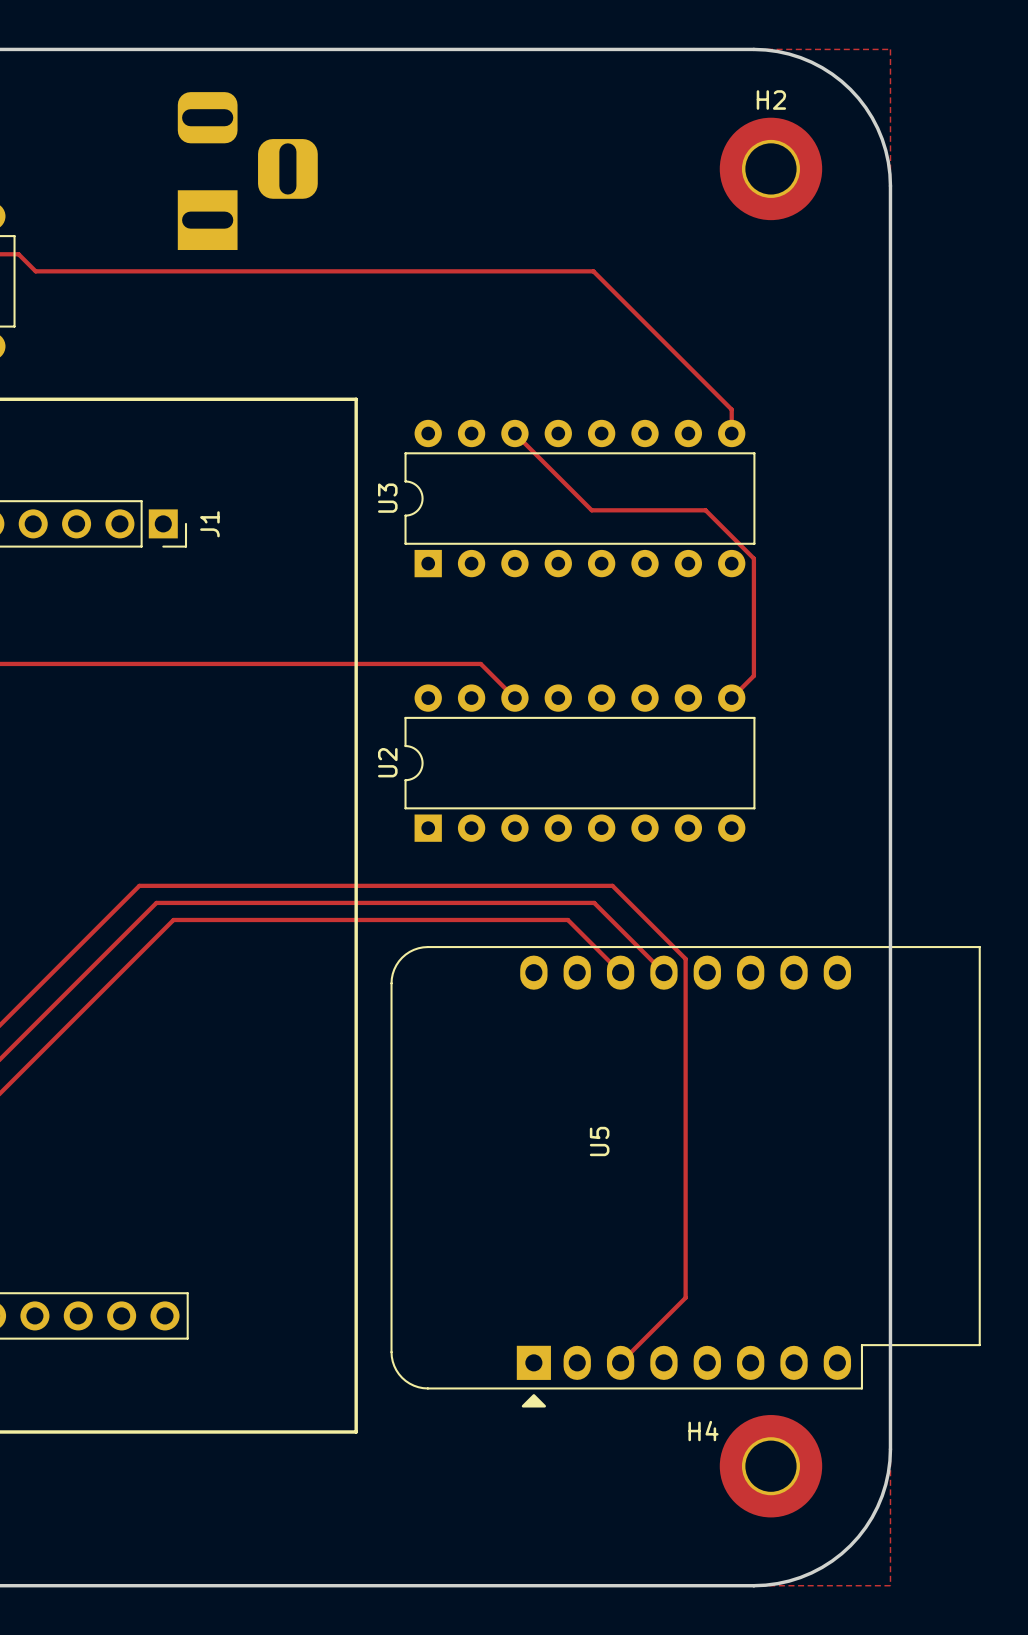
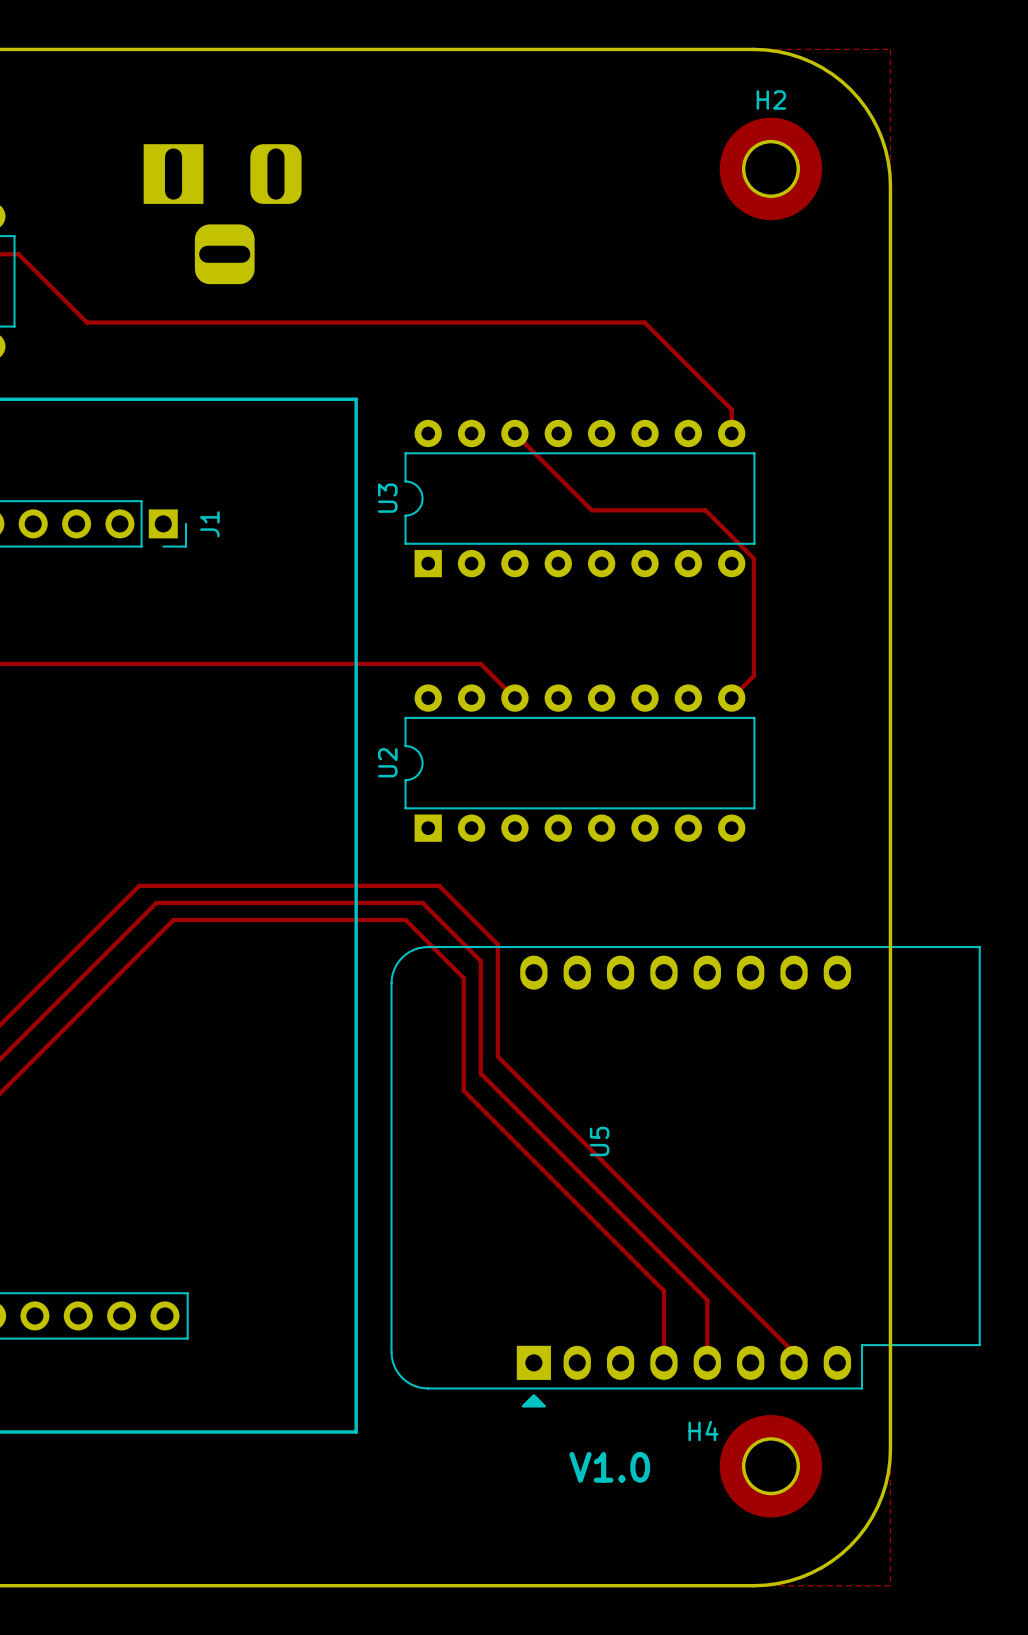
part rotation: 0° (247, 171) -> 90° clockwise (222, 214)
track: (35, 271) (593, 271) (644, 322) -> (35, 271) (86, 322) (644, 322)
track: (439, 885) (612, 885) (685, 958) (685, 1297) (620, 1362) -> (439, 885) (497, 944) (497, 1056) (794, 1352) (794, 1362)
track: (422, 902) (594, 902) (663, 972) -> (422, 902) (480, 961) (480, 1073) (707, 1300) (707, 1362)
track: (405, 919) (567, 919) (620, 972) -> (405, 919) (463, 978) (463, 1090) (663, 1290) (663, 1362)
text: none -> V1.0 (609, 1467)

